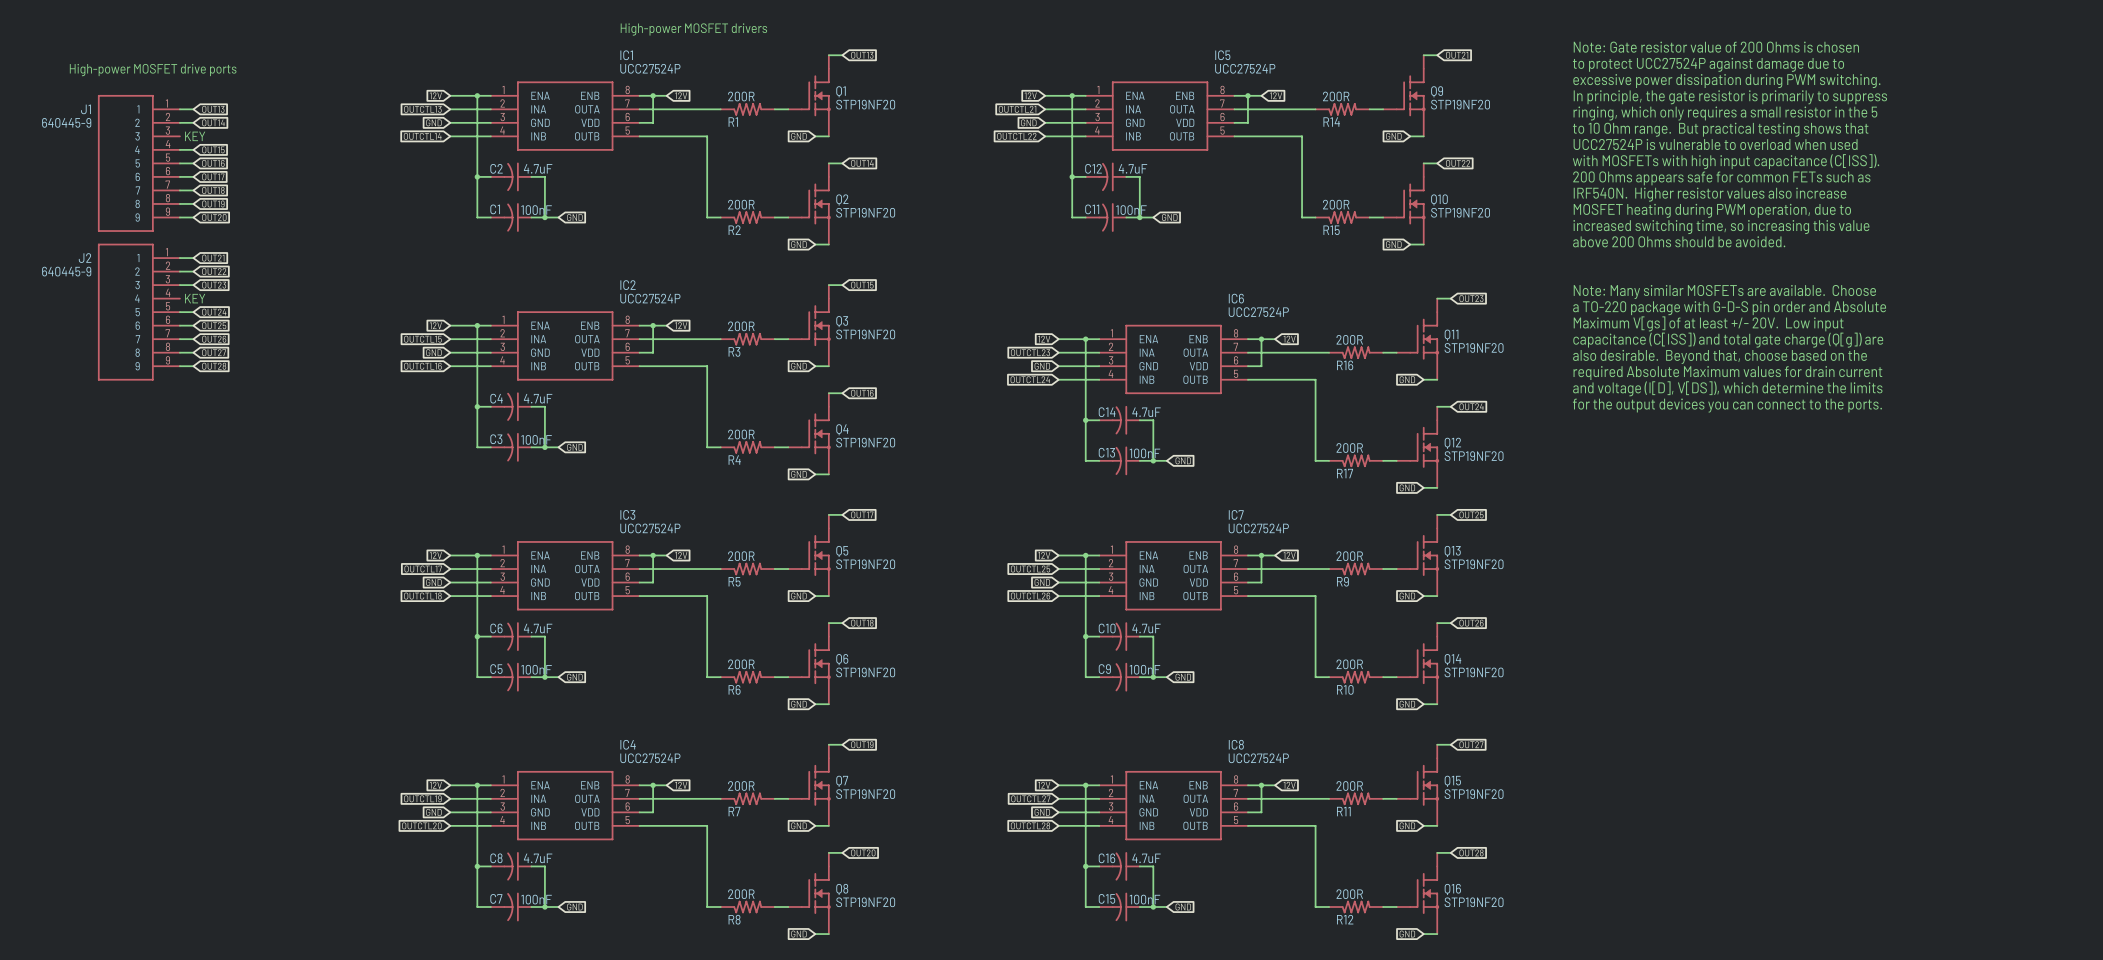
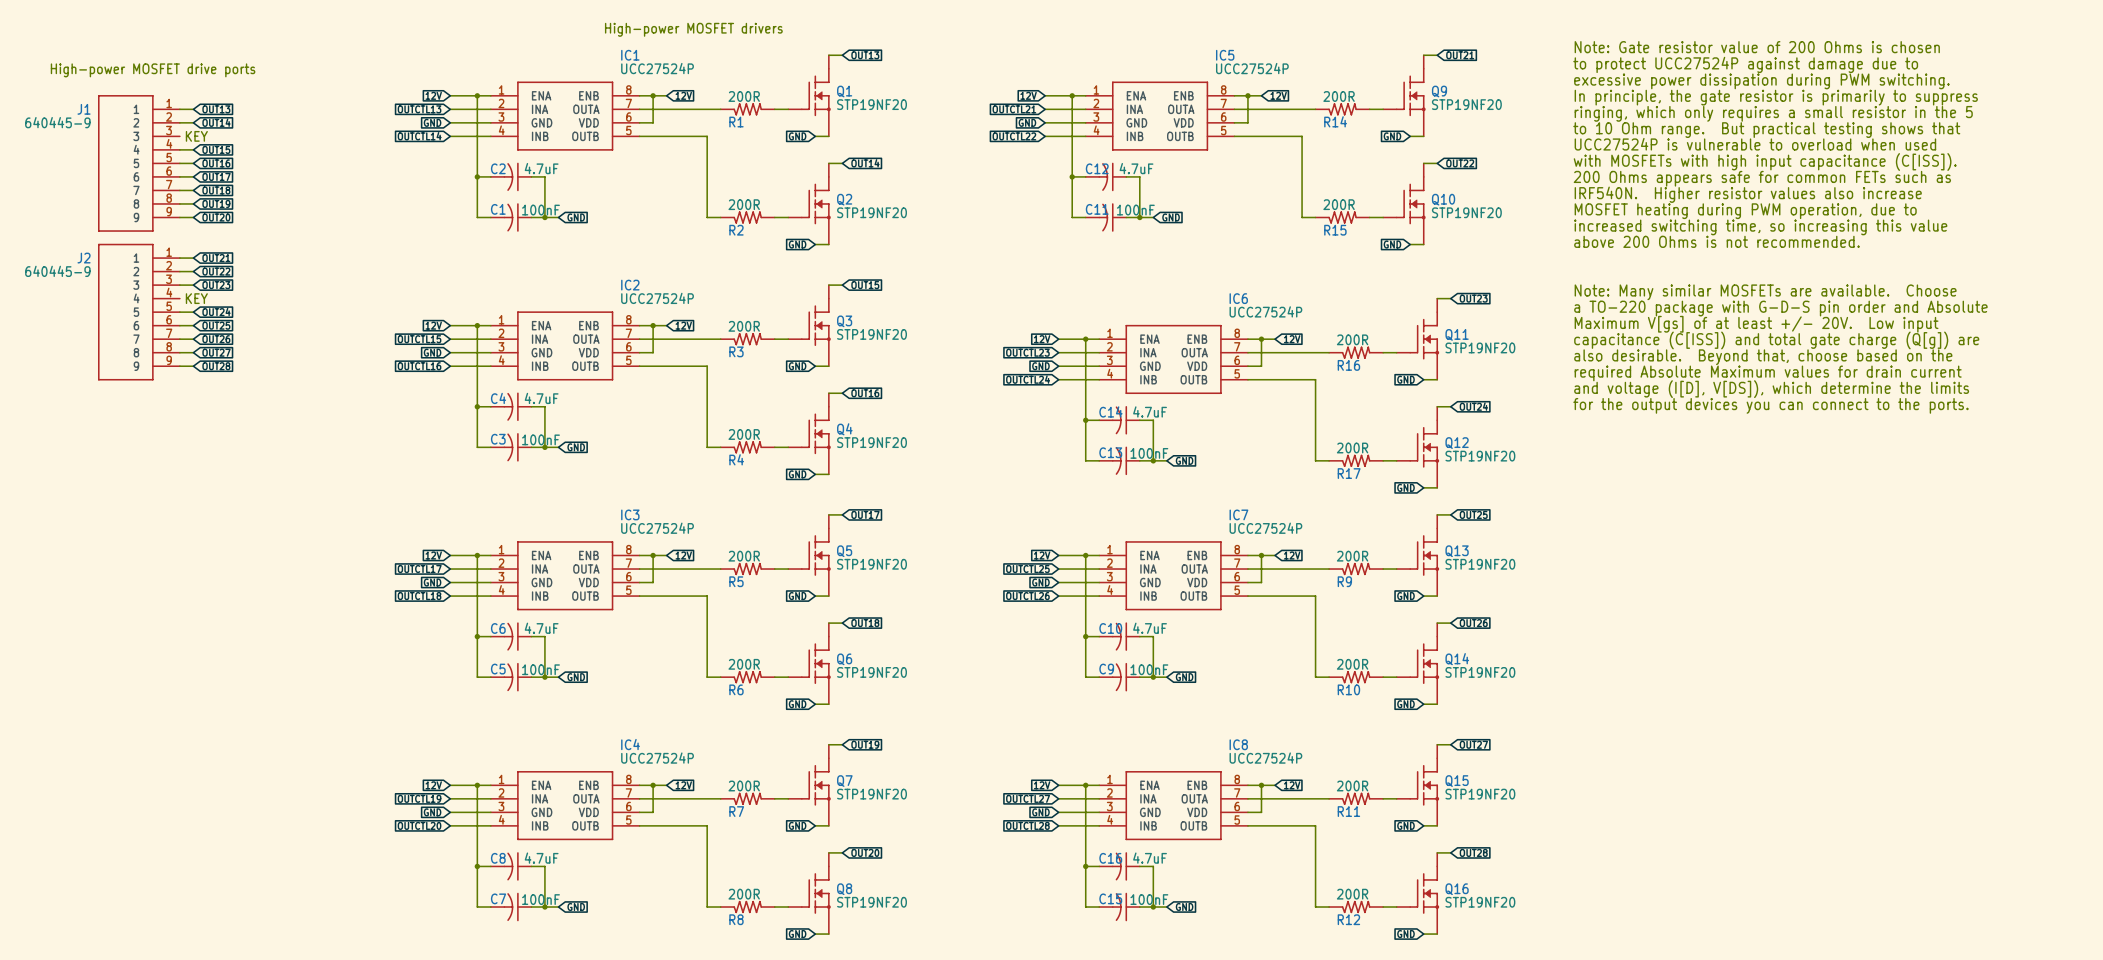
text: above 200 Ohms should be avoided. (1679, 241) -> above 200 Ohms is not recommended. (1716, 241)

